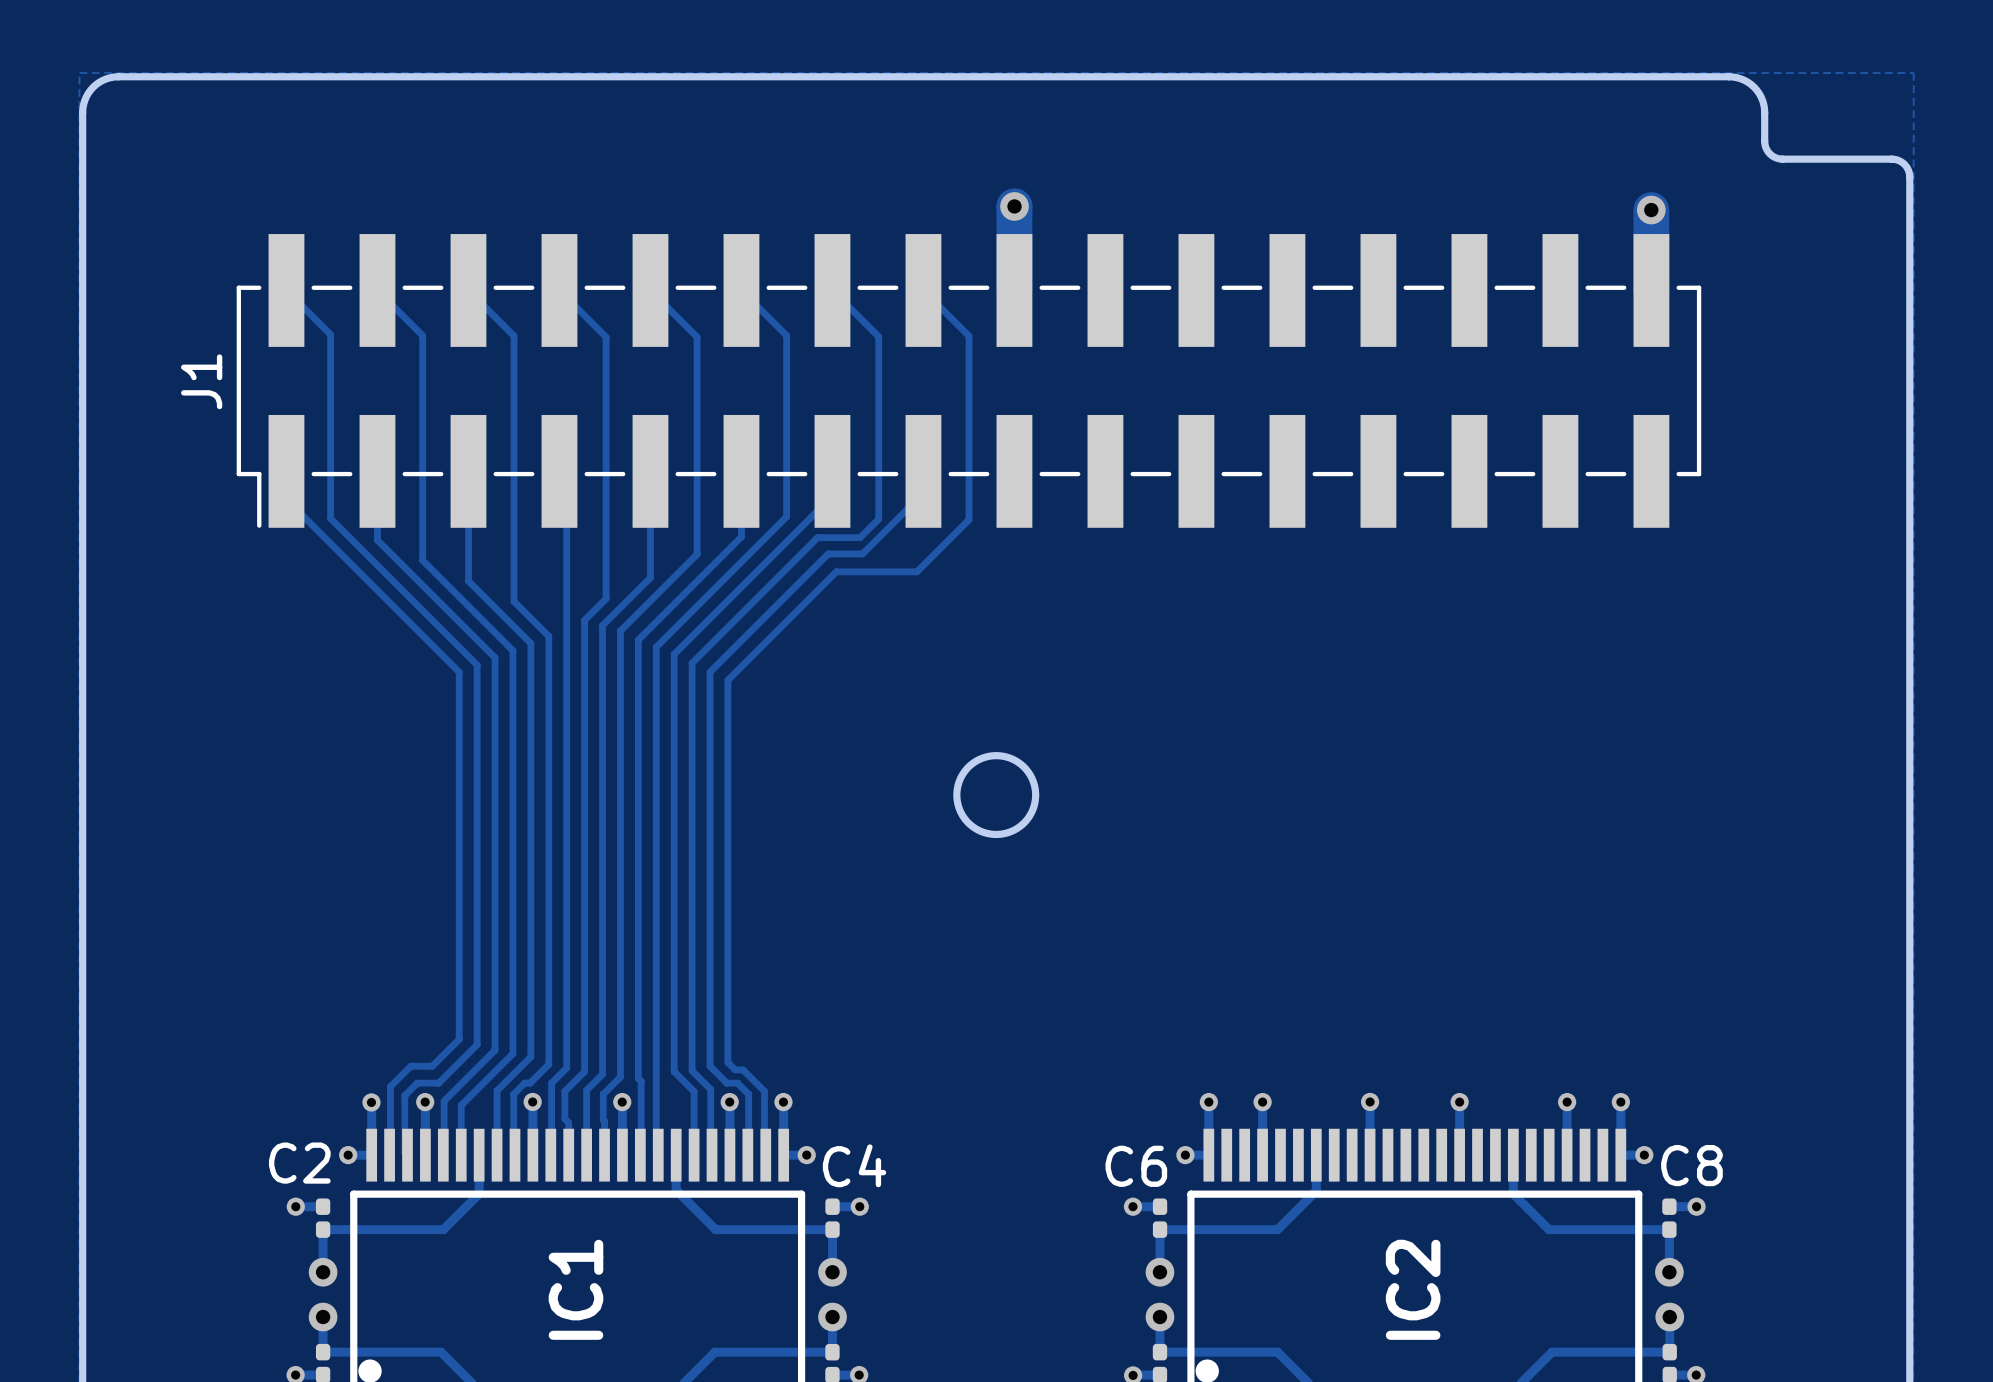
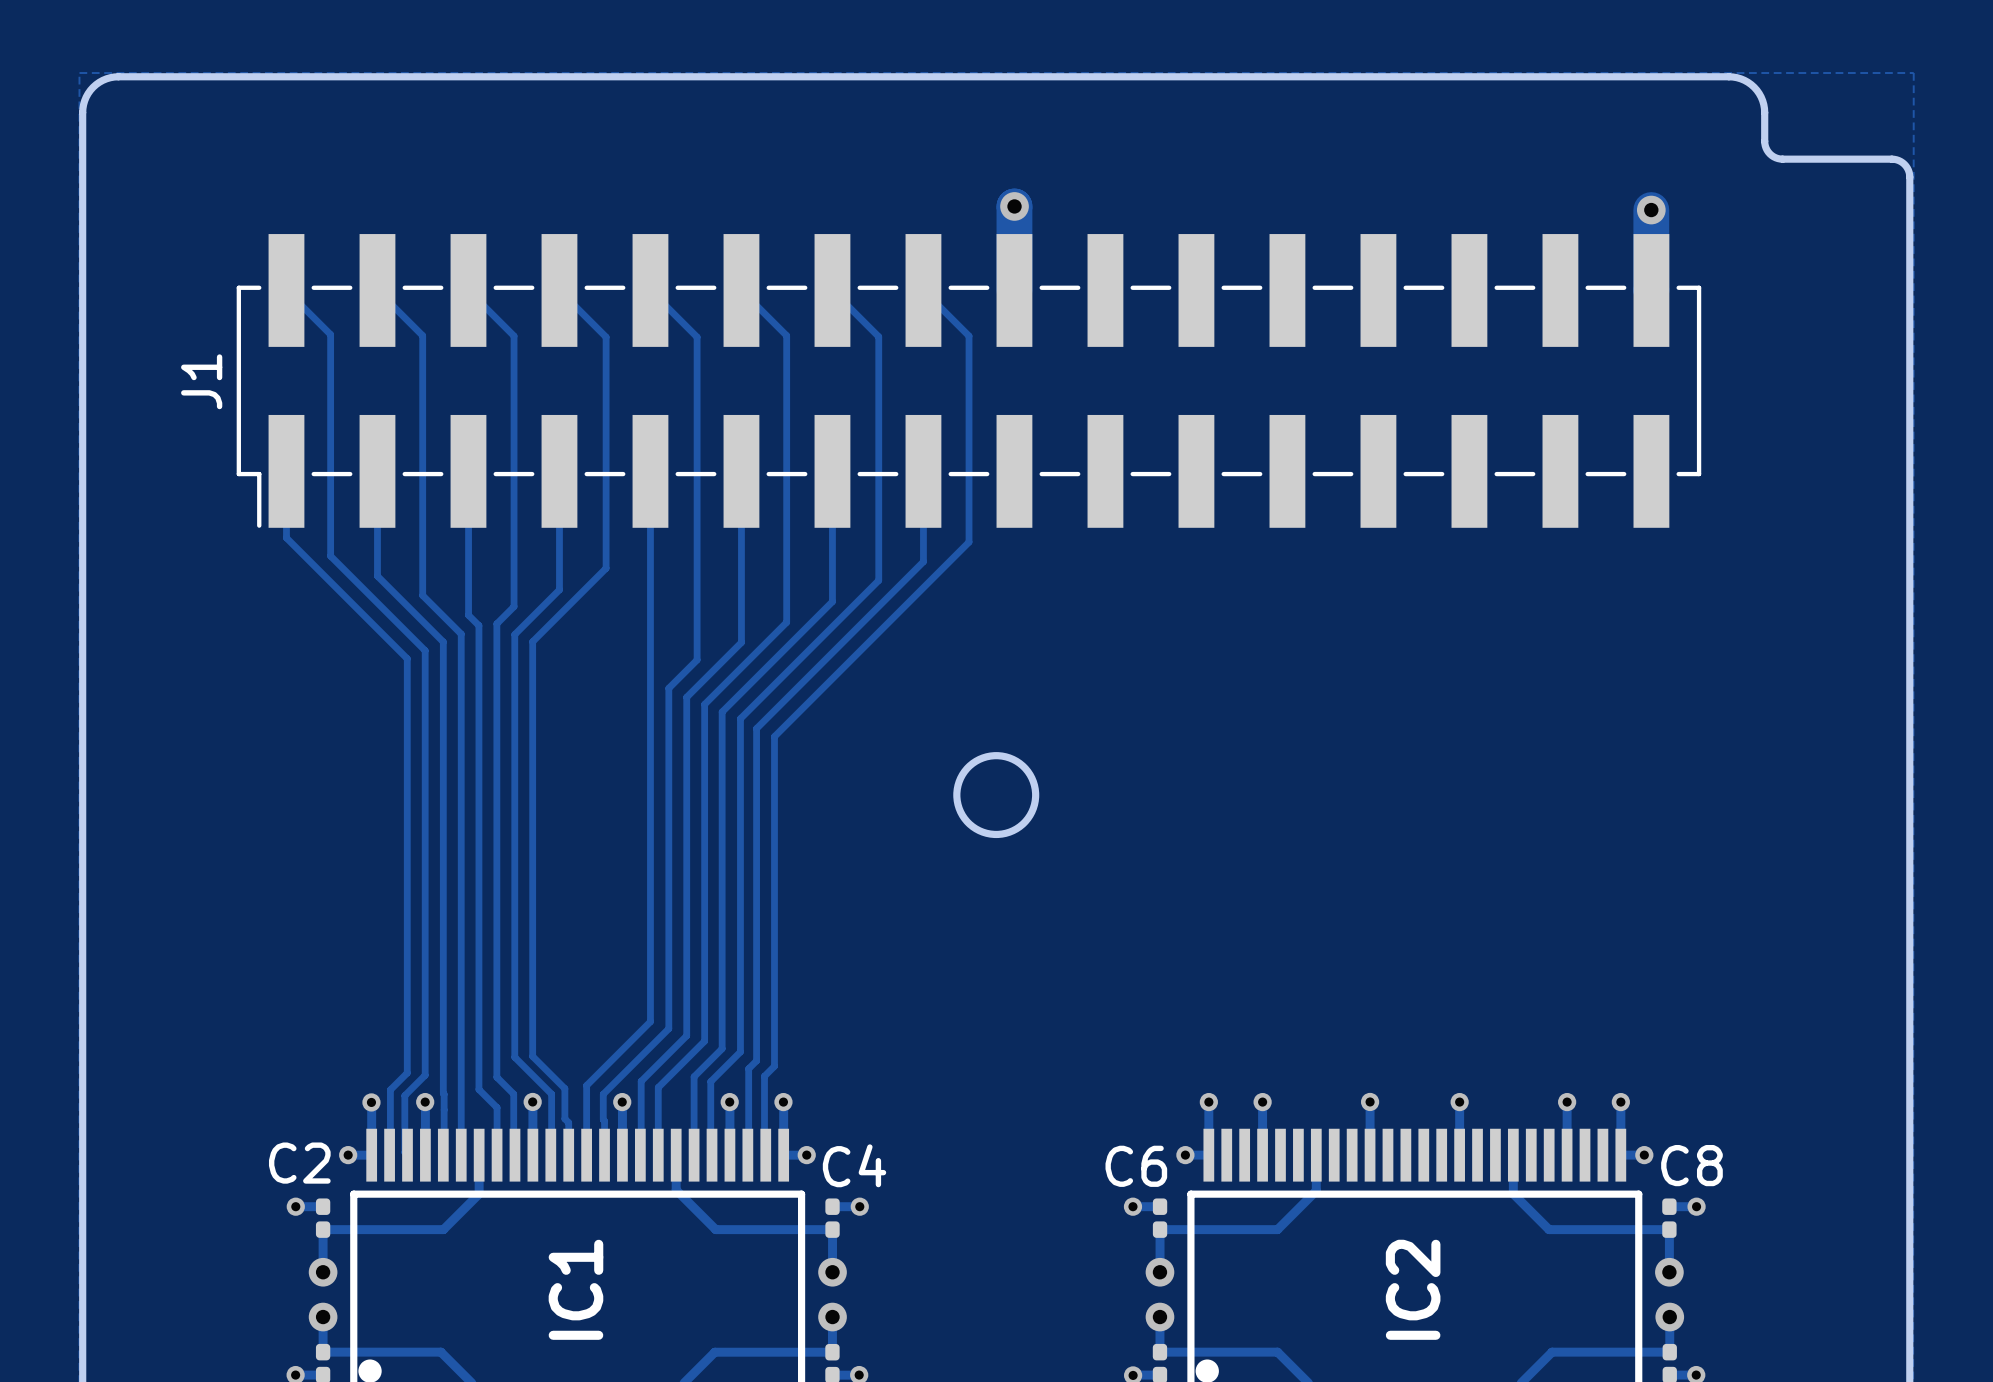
track: (559, 471) (566, 478) (566, 1068) (551, 1083) (551, 1094) -> (559, 471) (559, 589) (514, 634) (514, 1057) (551, 1094)
track: (923, 493) (862, 553) (828, 553) (710, 672) (710, 1066) (726, 1083) (737, 1083) (748, 1094) -> (923, 493) (923, 561) (756, 728) (756, 1060) (748, 1068) (748, 1094)
track: (832, 495) (674, 654) (674, 1071) (694, 1091) -> (832, 495) (832, 601) (722, 711) (722, 1048) (694, 1076) (694, 1091)
track: (286, 499) (459, 672) (459, 1039) (432, 1066) (410, 1066) (390, 1086) (390, 1089) -> (286, 499) (286, 537) (407, 658) (407, 1073) (390, 1089)
track: (786, 516) (656, 647) (656, 1153) (658, 1155) -> (786, 516) (786, 622) (704, 704) (704, 1041) (658, 1087) (658, 1155)
track: (330, 518) (477, 665) (477, 1044) (438, 1083) (417, 1083) -> (330, 518) (330, 556) (425, 650) (425, 1075) (417, 1083)
track: (878, 519) (860, 537) (817, 537) (692, 663) (692, 1070) (710, 1089) -> (878, 519) (878, 580) (740, 718) (740, 1051) (710, 1081) (710, 1089)
track: (969, 519) (916, 571) (836, 571) (727, 680) (727, 1062) (735, 1069) (743, 1069) (764, 1091) -> (969, 519) (969, 542) (774, 736) (774, 1066) (764, 1076) (764, 1091)
track: (741, 536) (638, 639) (638, 1078) (641, 1081) -> (741, 536) (741, 642) (686, 697) (686, 1035) (641, 1081)
track: (377, 540) (495, 657) (495, 1050) (444, 1101) -> (377, 540) (377, 576) (443, 641) (444, 1101)
track: (697, 554) (620, 630) (620, 1077) -> (697, 554) (697, 660) (668, 688) (668, 1028) (620, 1077)
track: (422, 560) (512, 650) (512, 1053) (461, 1105) -> (422, 560) (422, 595) (461, 634) (461, 1105)
track: (606, 568) (606, 598) (584, 620) (584, 1071) (564, 1091) -> (606, 568) (532, 641) (532, 1056) (564, 1088) (564, 1091)
track: (650, 577) (602, 625) (602, 1074) (586, 1090) -> (650, 577) (650, 1021) (586, 1085) (586, 1090)
track: (468, 581) (530, 643) (530, 1056) (497, 1090) (497, 1107) -> (468, 581) (468, 615) (478, 625) (478, 1089) (497, 1107)
track: (514, 601) (548, 636) (548, 1064) (530, 1083) (524, 1083) (513, 1094) -> (514, 601) (514, 606) (496, 623) (496, 1077) (513, 1094)

